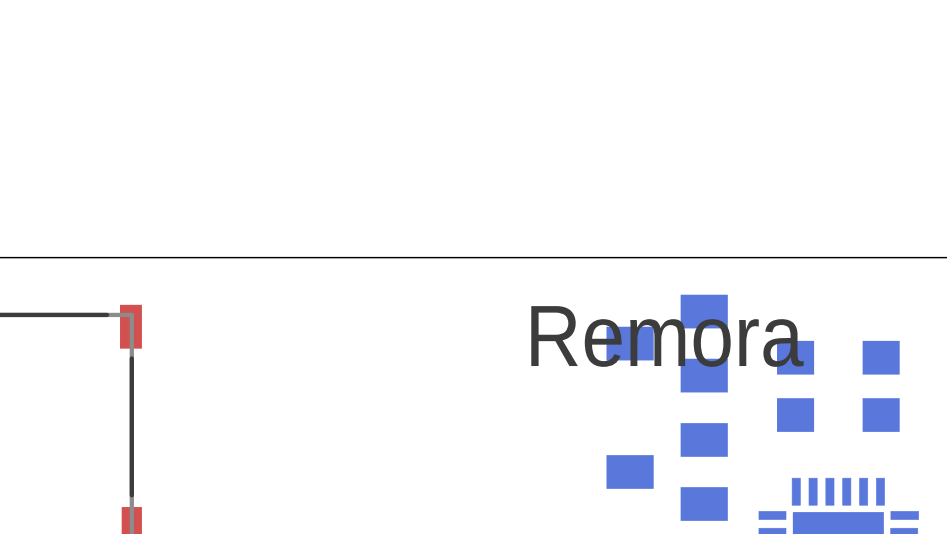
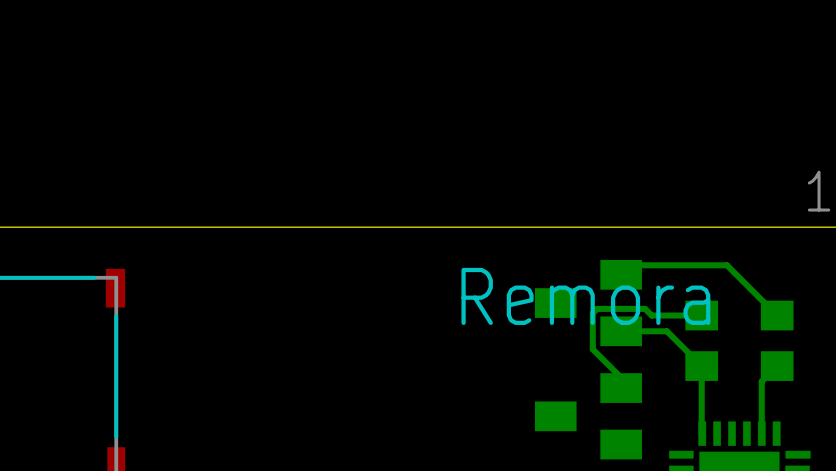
bottom track: none -> (621, 274) (630, 265) (726, 265) (777, 315)
bottom track: none -> (701, 315) (651, 315) (645, 308) (597, 308) (592, 313) (592, 349) (621, 377) (621, 388)
bottom track: none -> (621, 331) (666, 331) (701, 366) (702, 433)
bottom track: none -> (777, 366) (761, 381) (761, 433)

